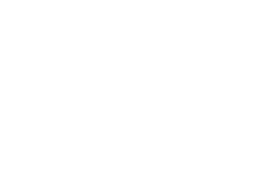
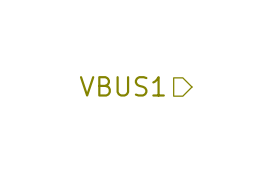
hierarchical label: none -> VBUS1 (122, 86)

